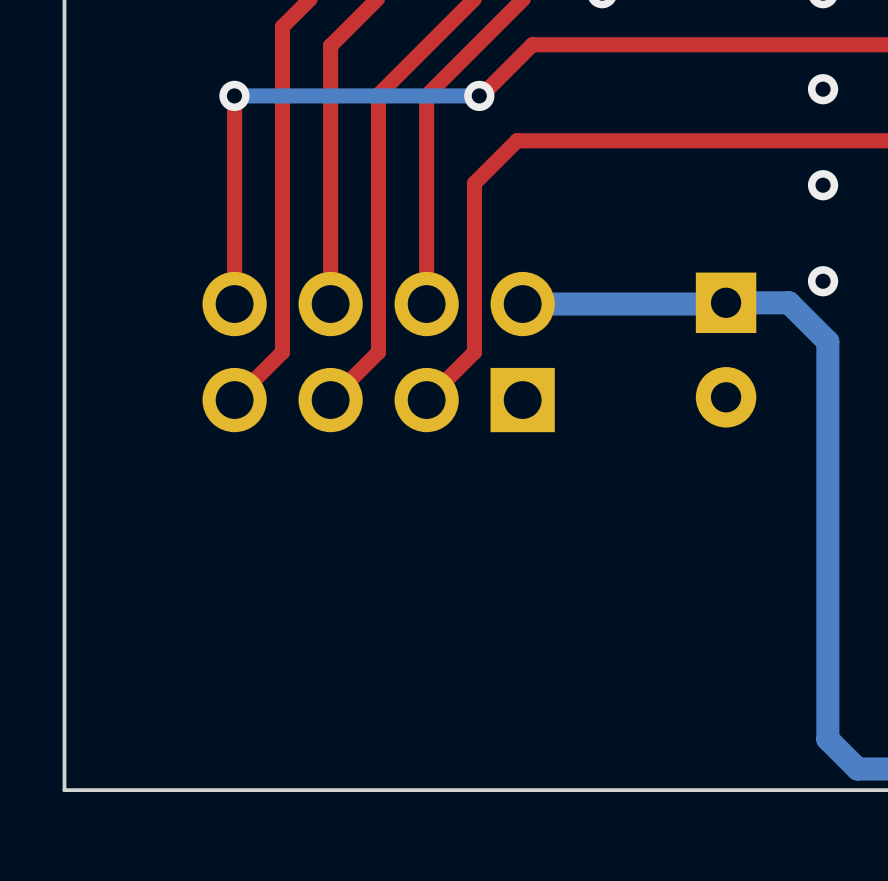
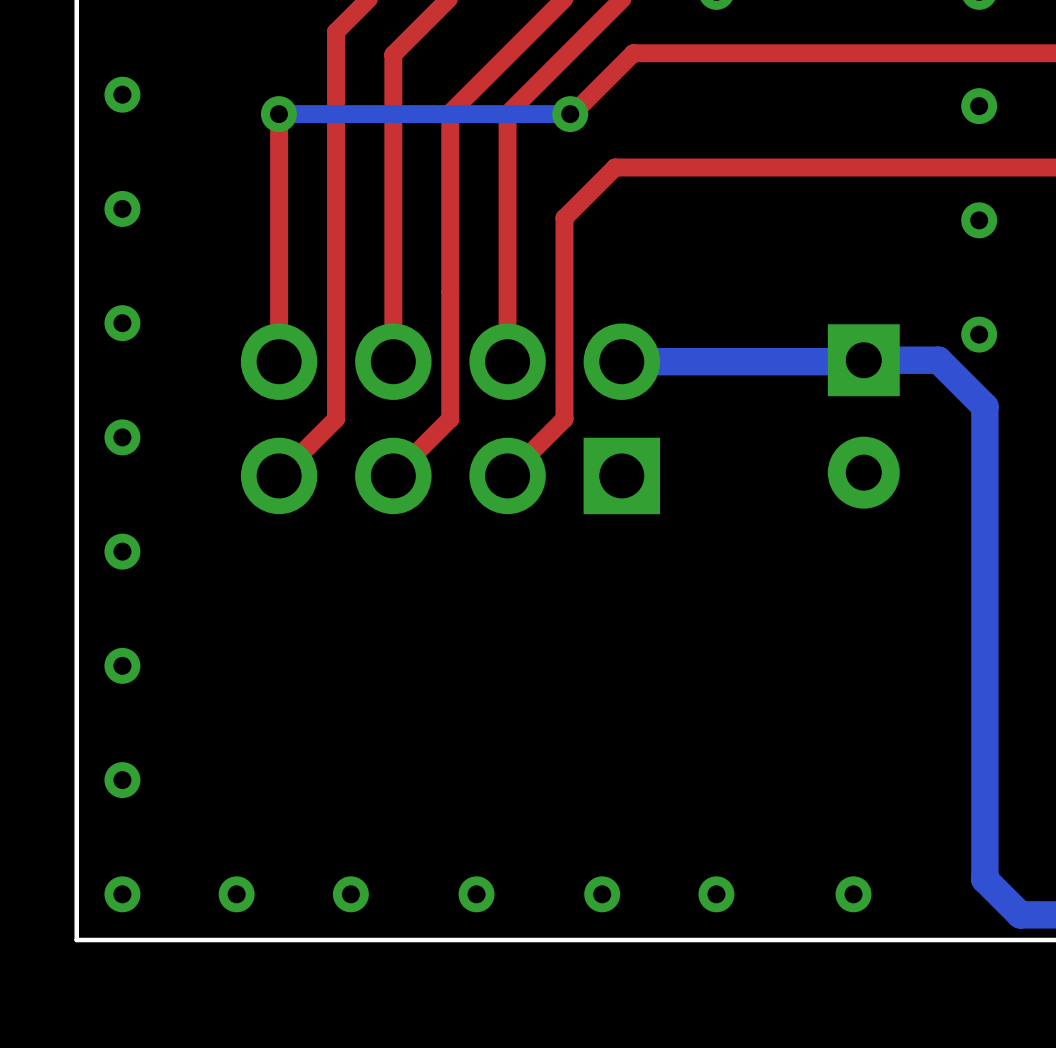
via: none -> (122, 94)
via: none -> (122, 208)
via: none -> (122, 323)
via: none -> (122, 437)
via: none -> (122, 551)
via: none -> (122, 665)
via: none -> (122, 780)
via: none -> (122, 894)
via: none -> (236, 894)
via: none -> (350, 894)
via: none -> (476, 894)
via: none -> (602, 894)
via: none -> (716, 894)
via: none -> (853, 894)

